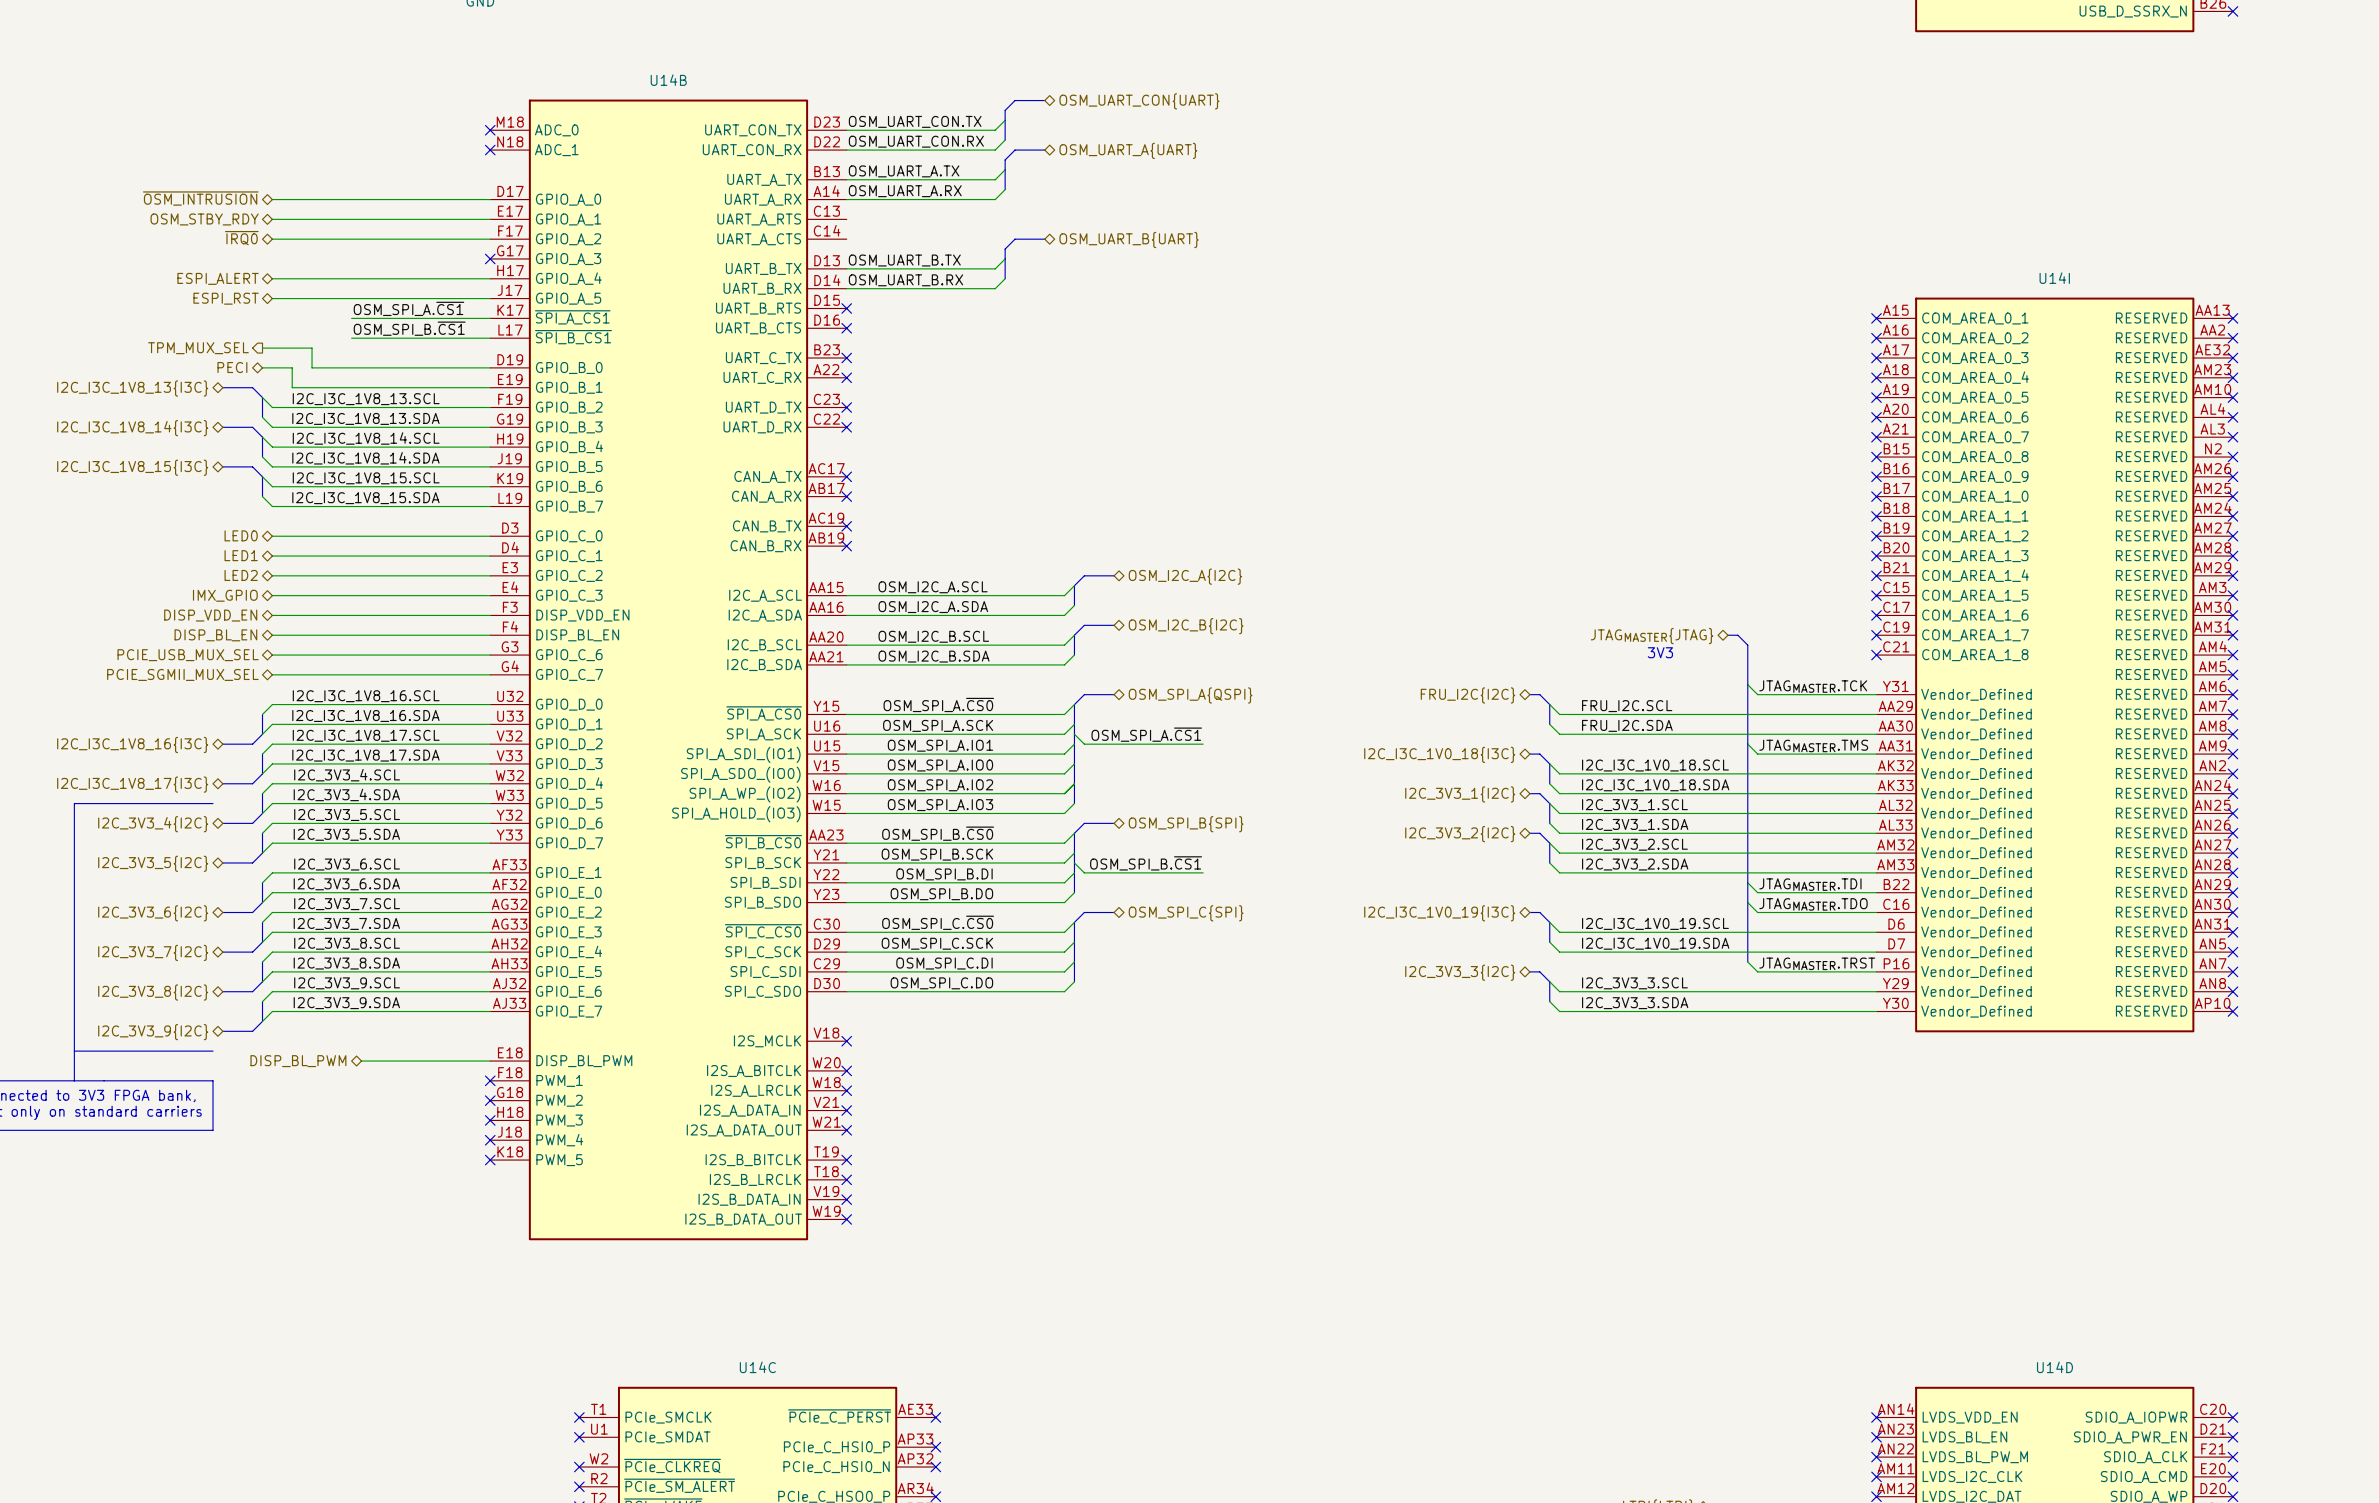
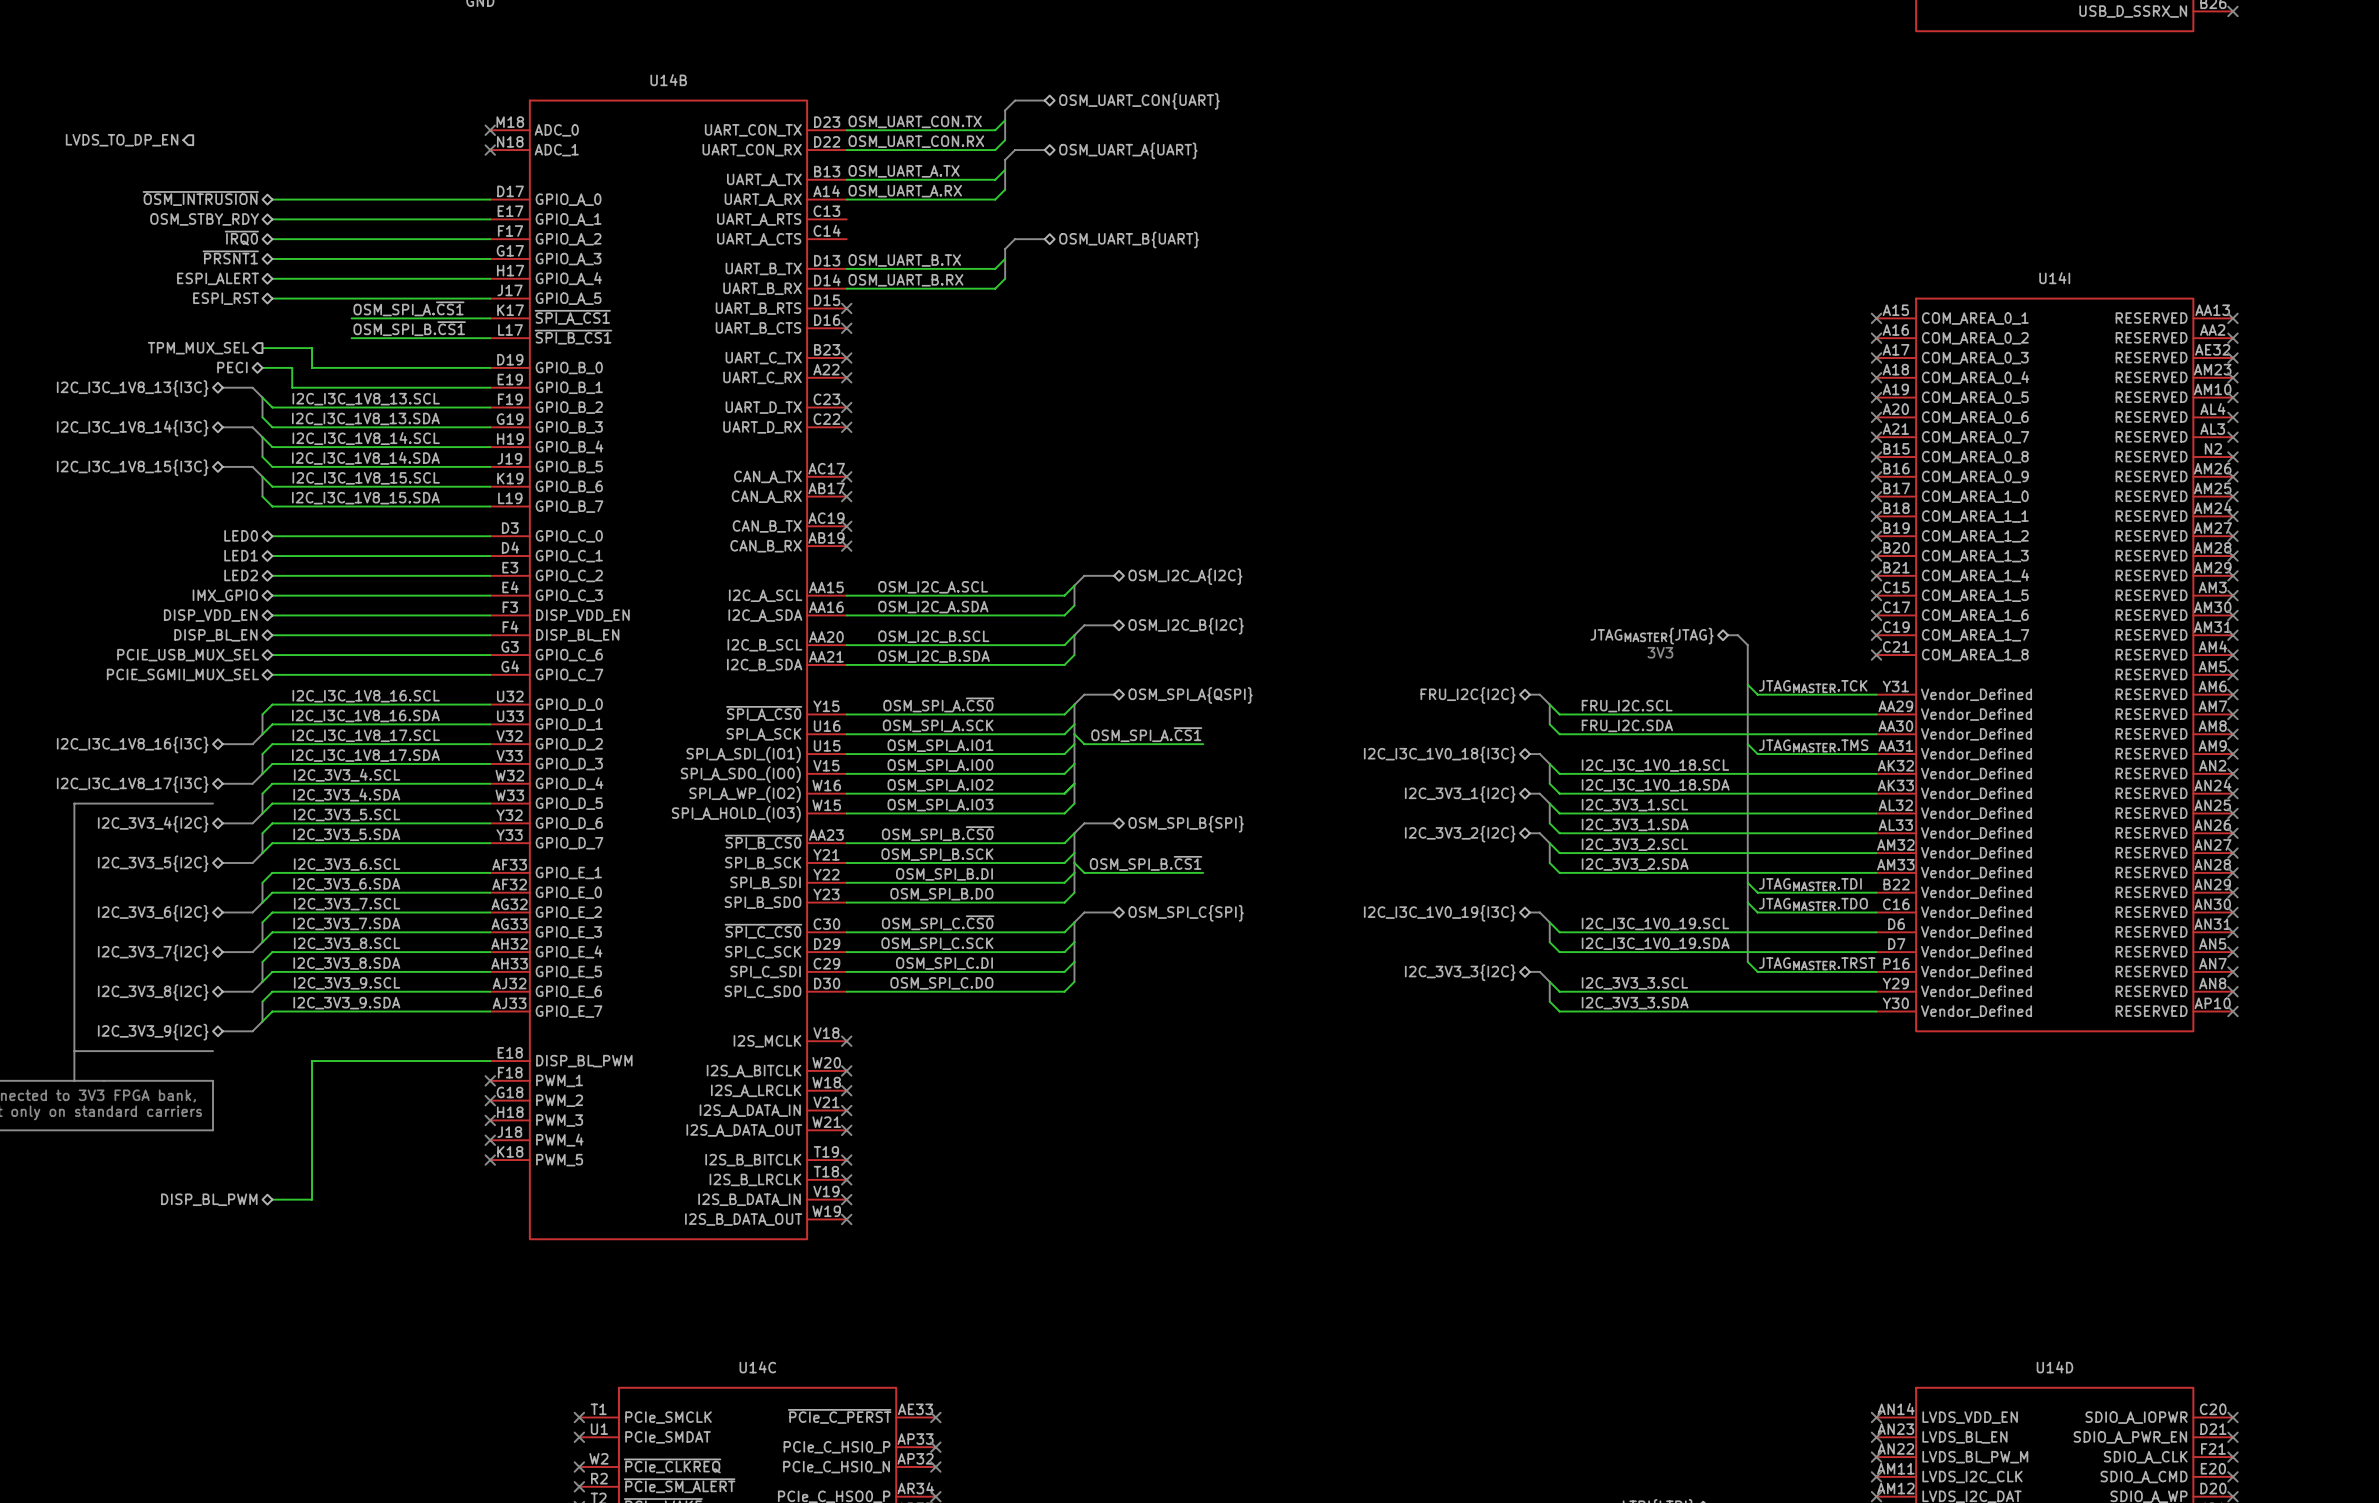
hierarchical label: none -> LVDS_TO_DP_EN (122, 140)
hierarchical label: none -> ~{PRSNT1} (230, 257)
wire: none -> (272, 258) (490, 258)
no-connect mark: (490, 258) -> none
hierarchical label position: DISP_BL_PWM (298, 1061) -> DISP_BL_PWM (209, 1199)
wire: none -> (361, 1061) (312, 1061) (312, 1199) (272, 1199)

